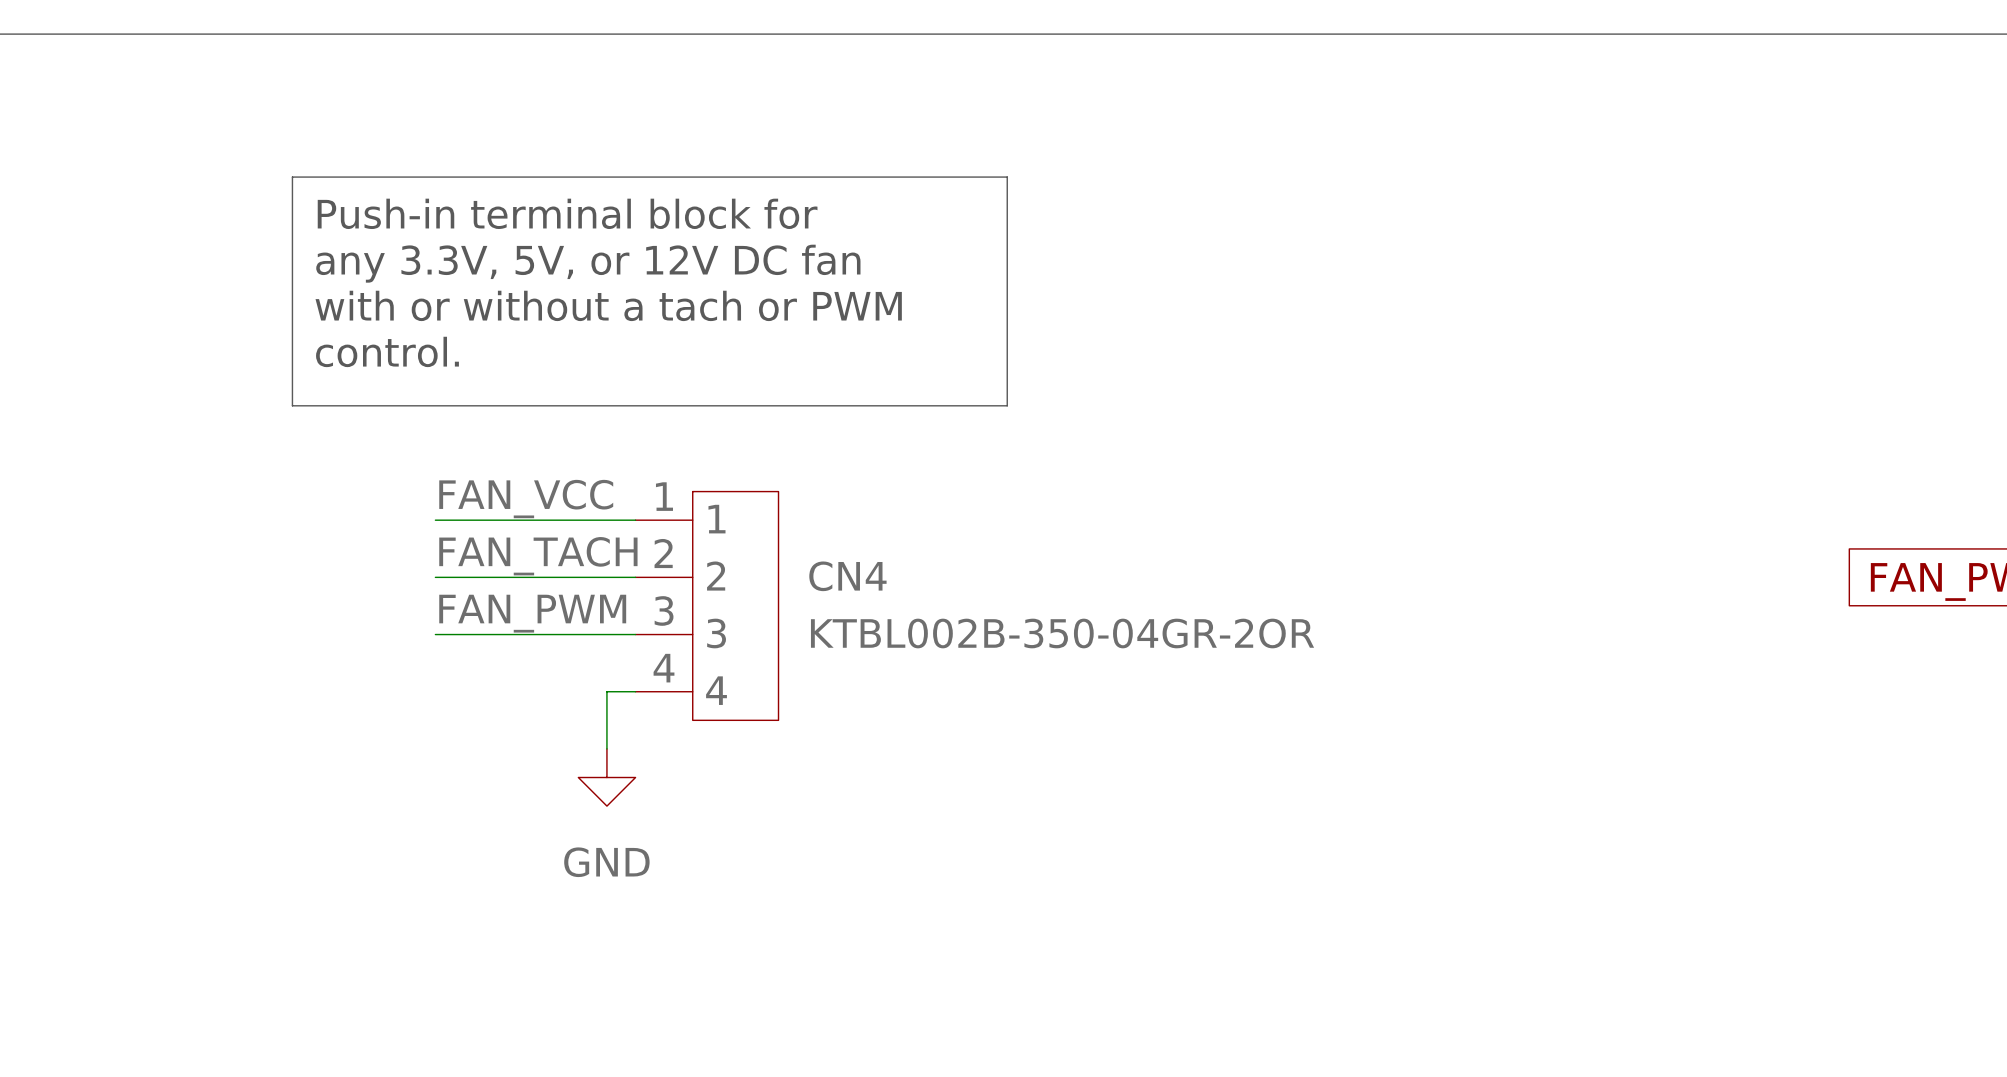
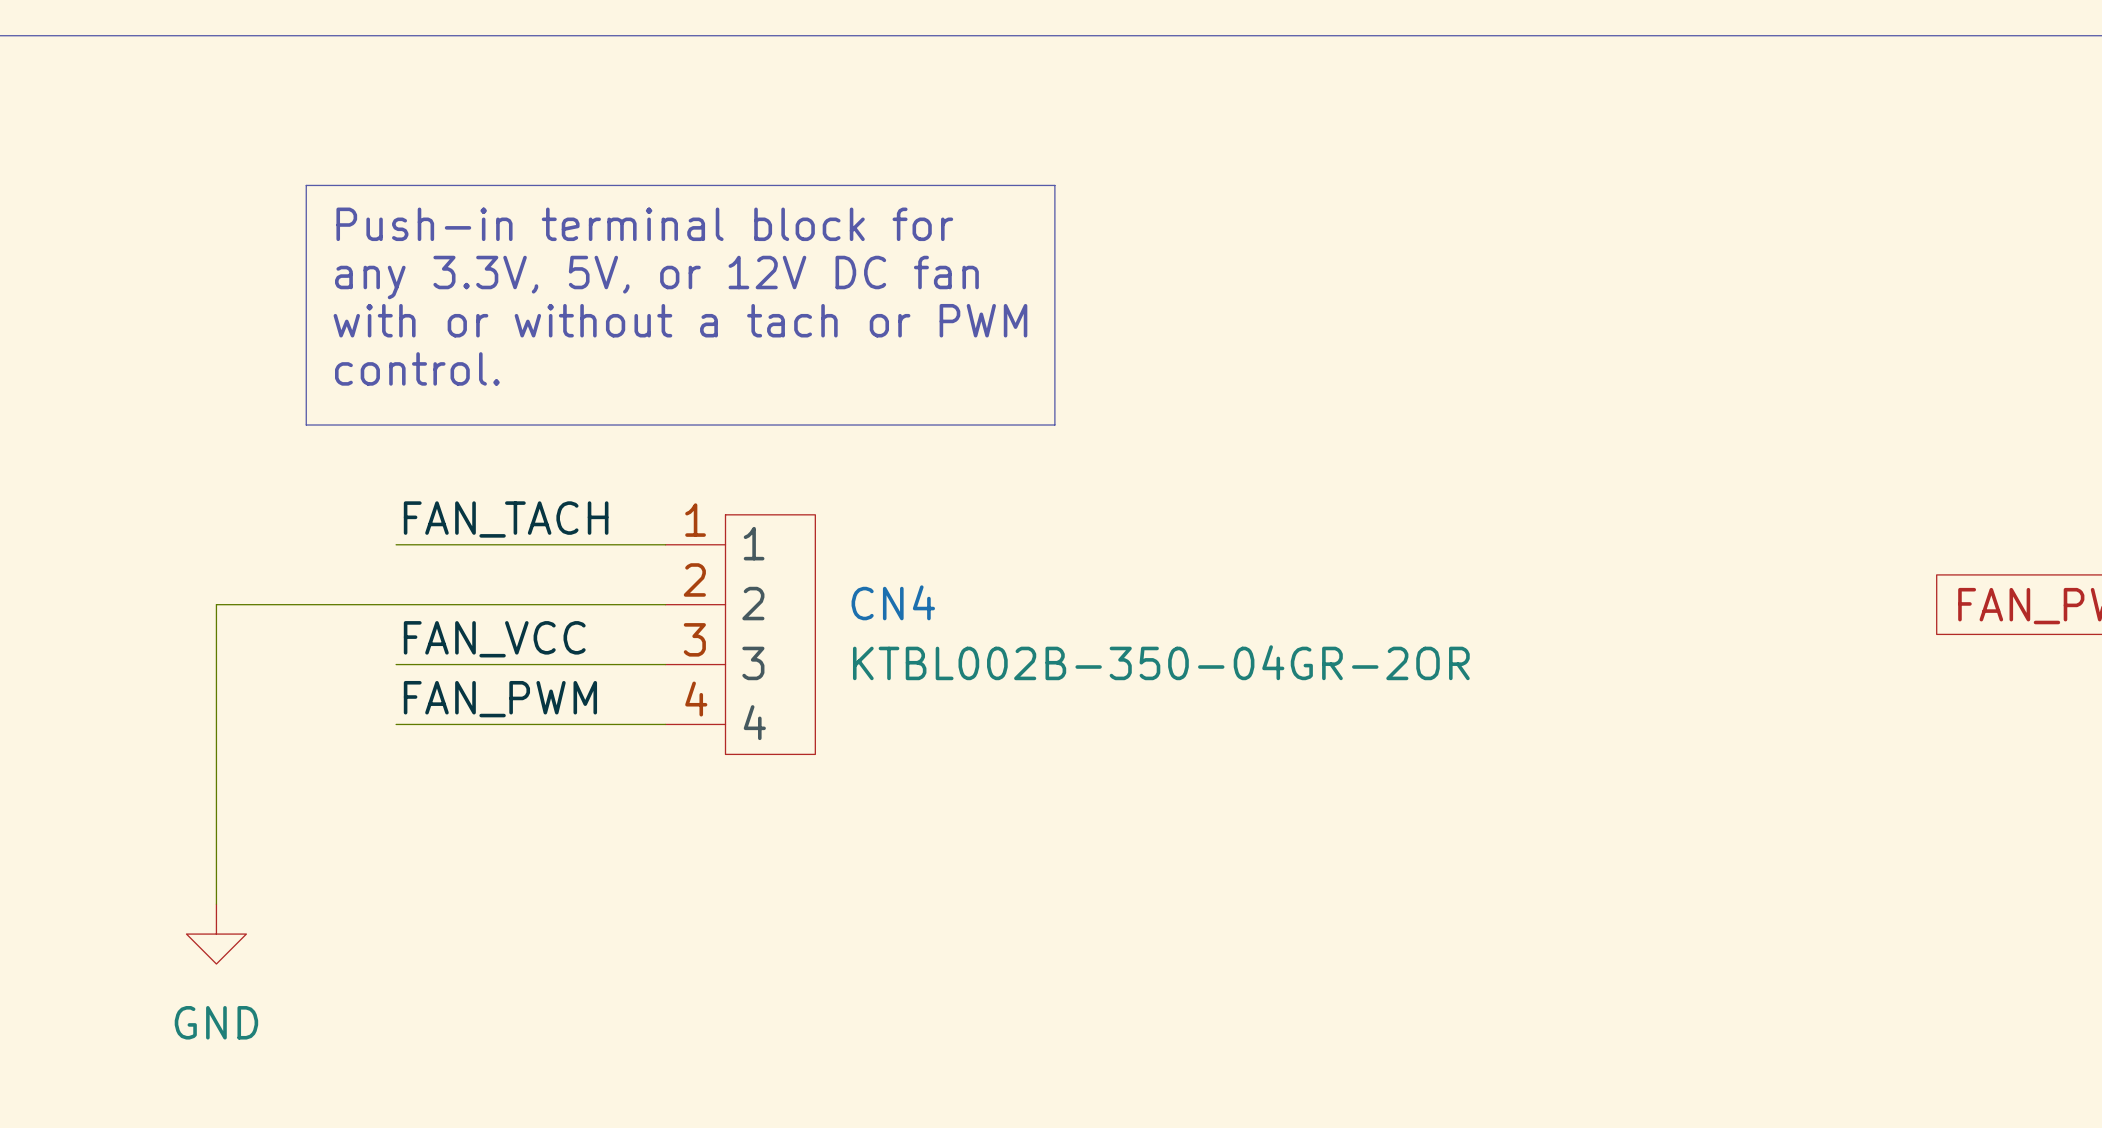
label position: FAN_VCC (526, 499) -> FAN_VCC (494, 639)
wire: none -> (396, 544) (455, 544)
label position: FAN_TACH (538, 556) -> FAN_TACH (506, 519)
wire: none -> (455, 604) (216, 604) (216, 904)
label position: FAN_PWM (532, 613) -> FAN_PWM (500, 699)
wire: none -> (396, 664) (455, 664)
wire: (606, 691) (606, 748) -> (635, 724) (396, 724)
power symbol position: GND (606, 777) -> GND (216, 934)

